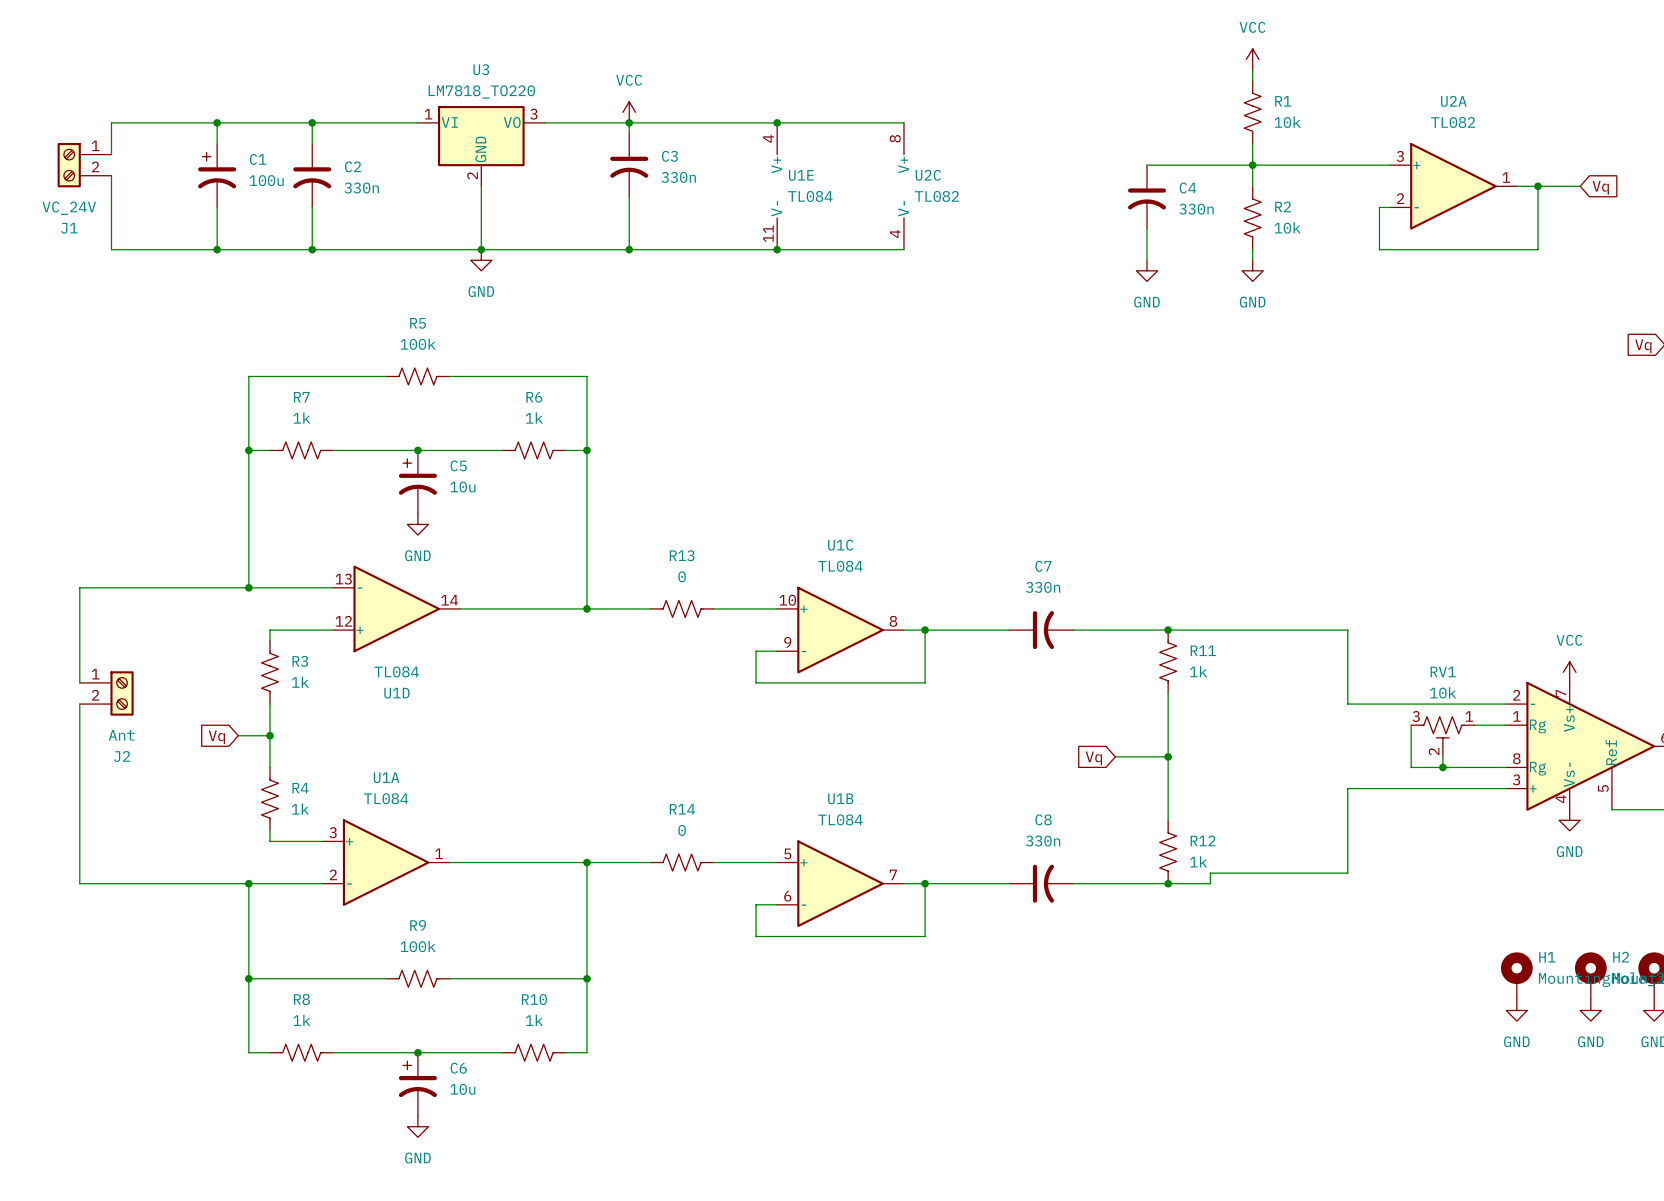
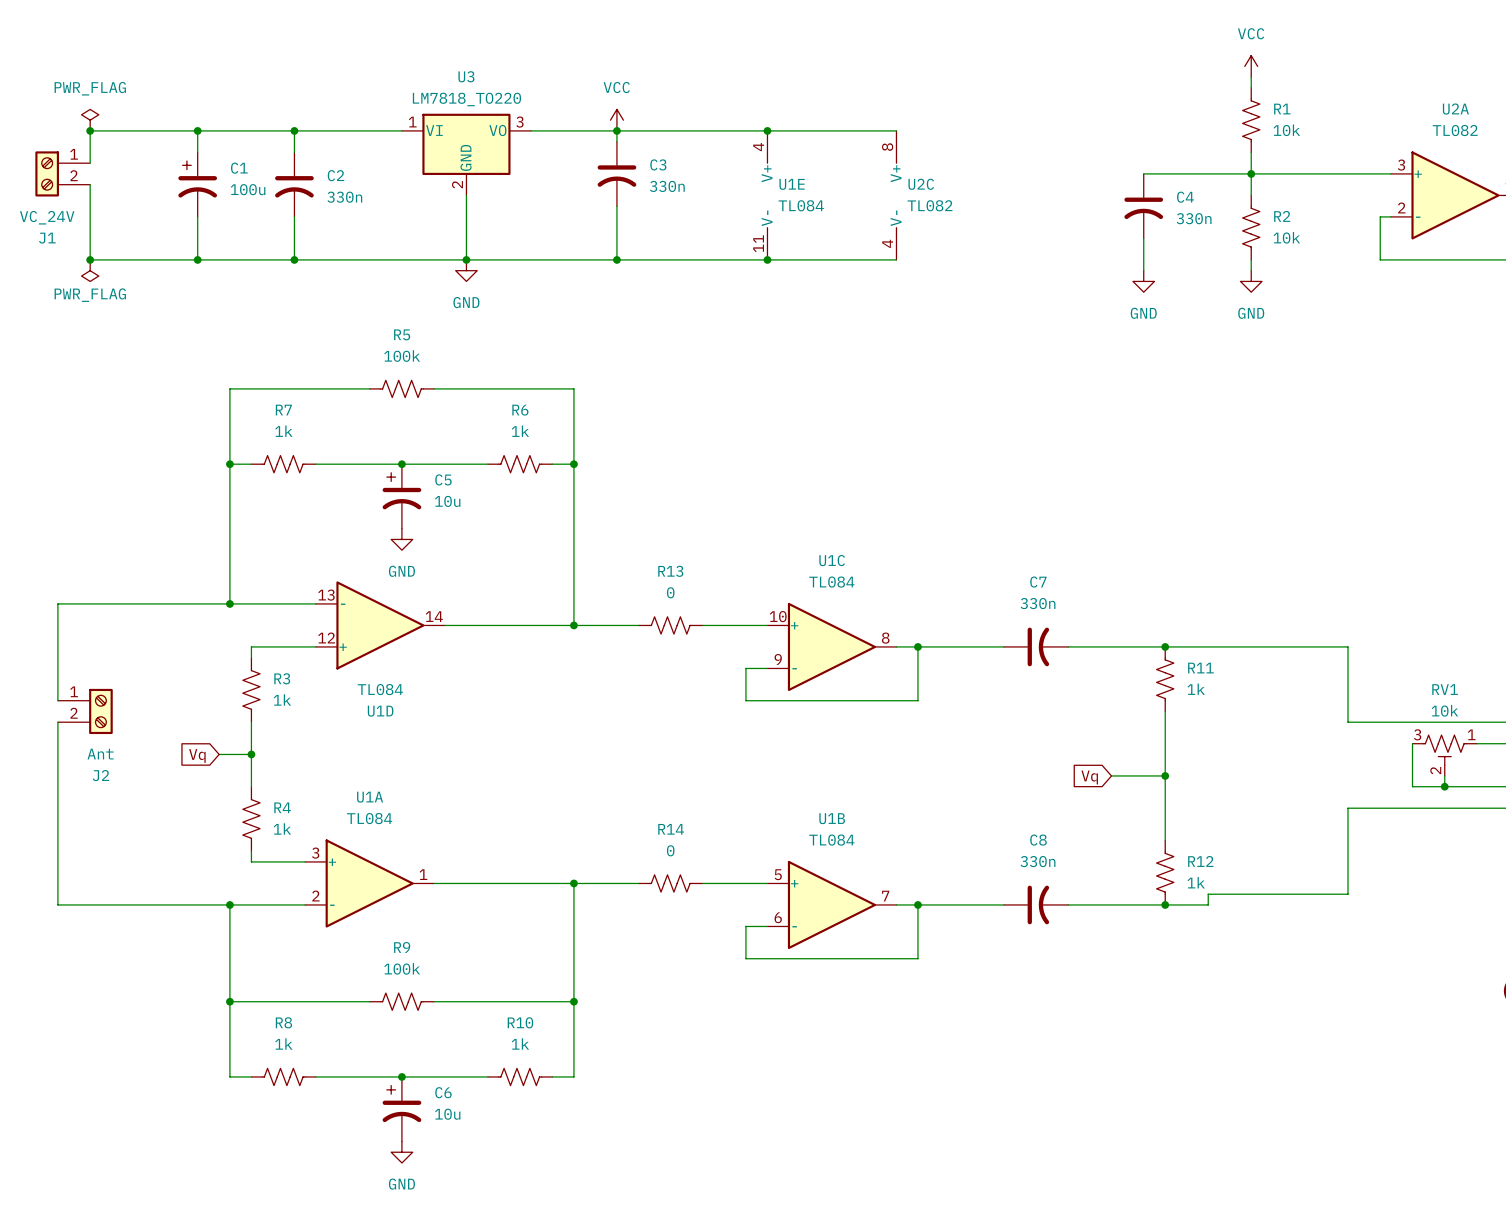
power symbol: none -> PWR_FLAG (90, 120)
junction: none -> (90, 130)
junction: none -> (90, 259)
power symbol: none -> PWR_FLAG (90, 270)

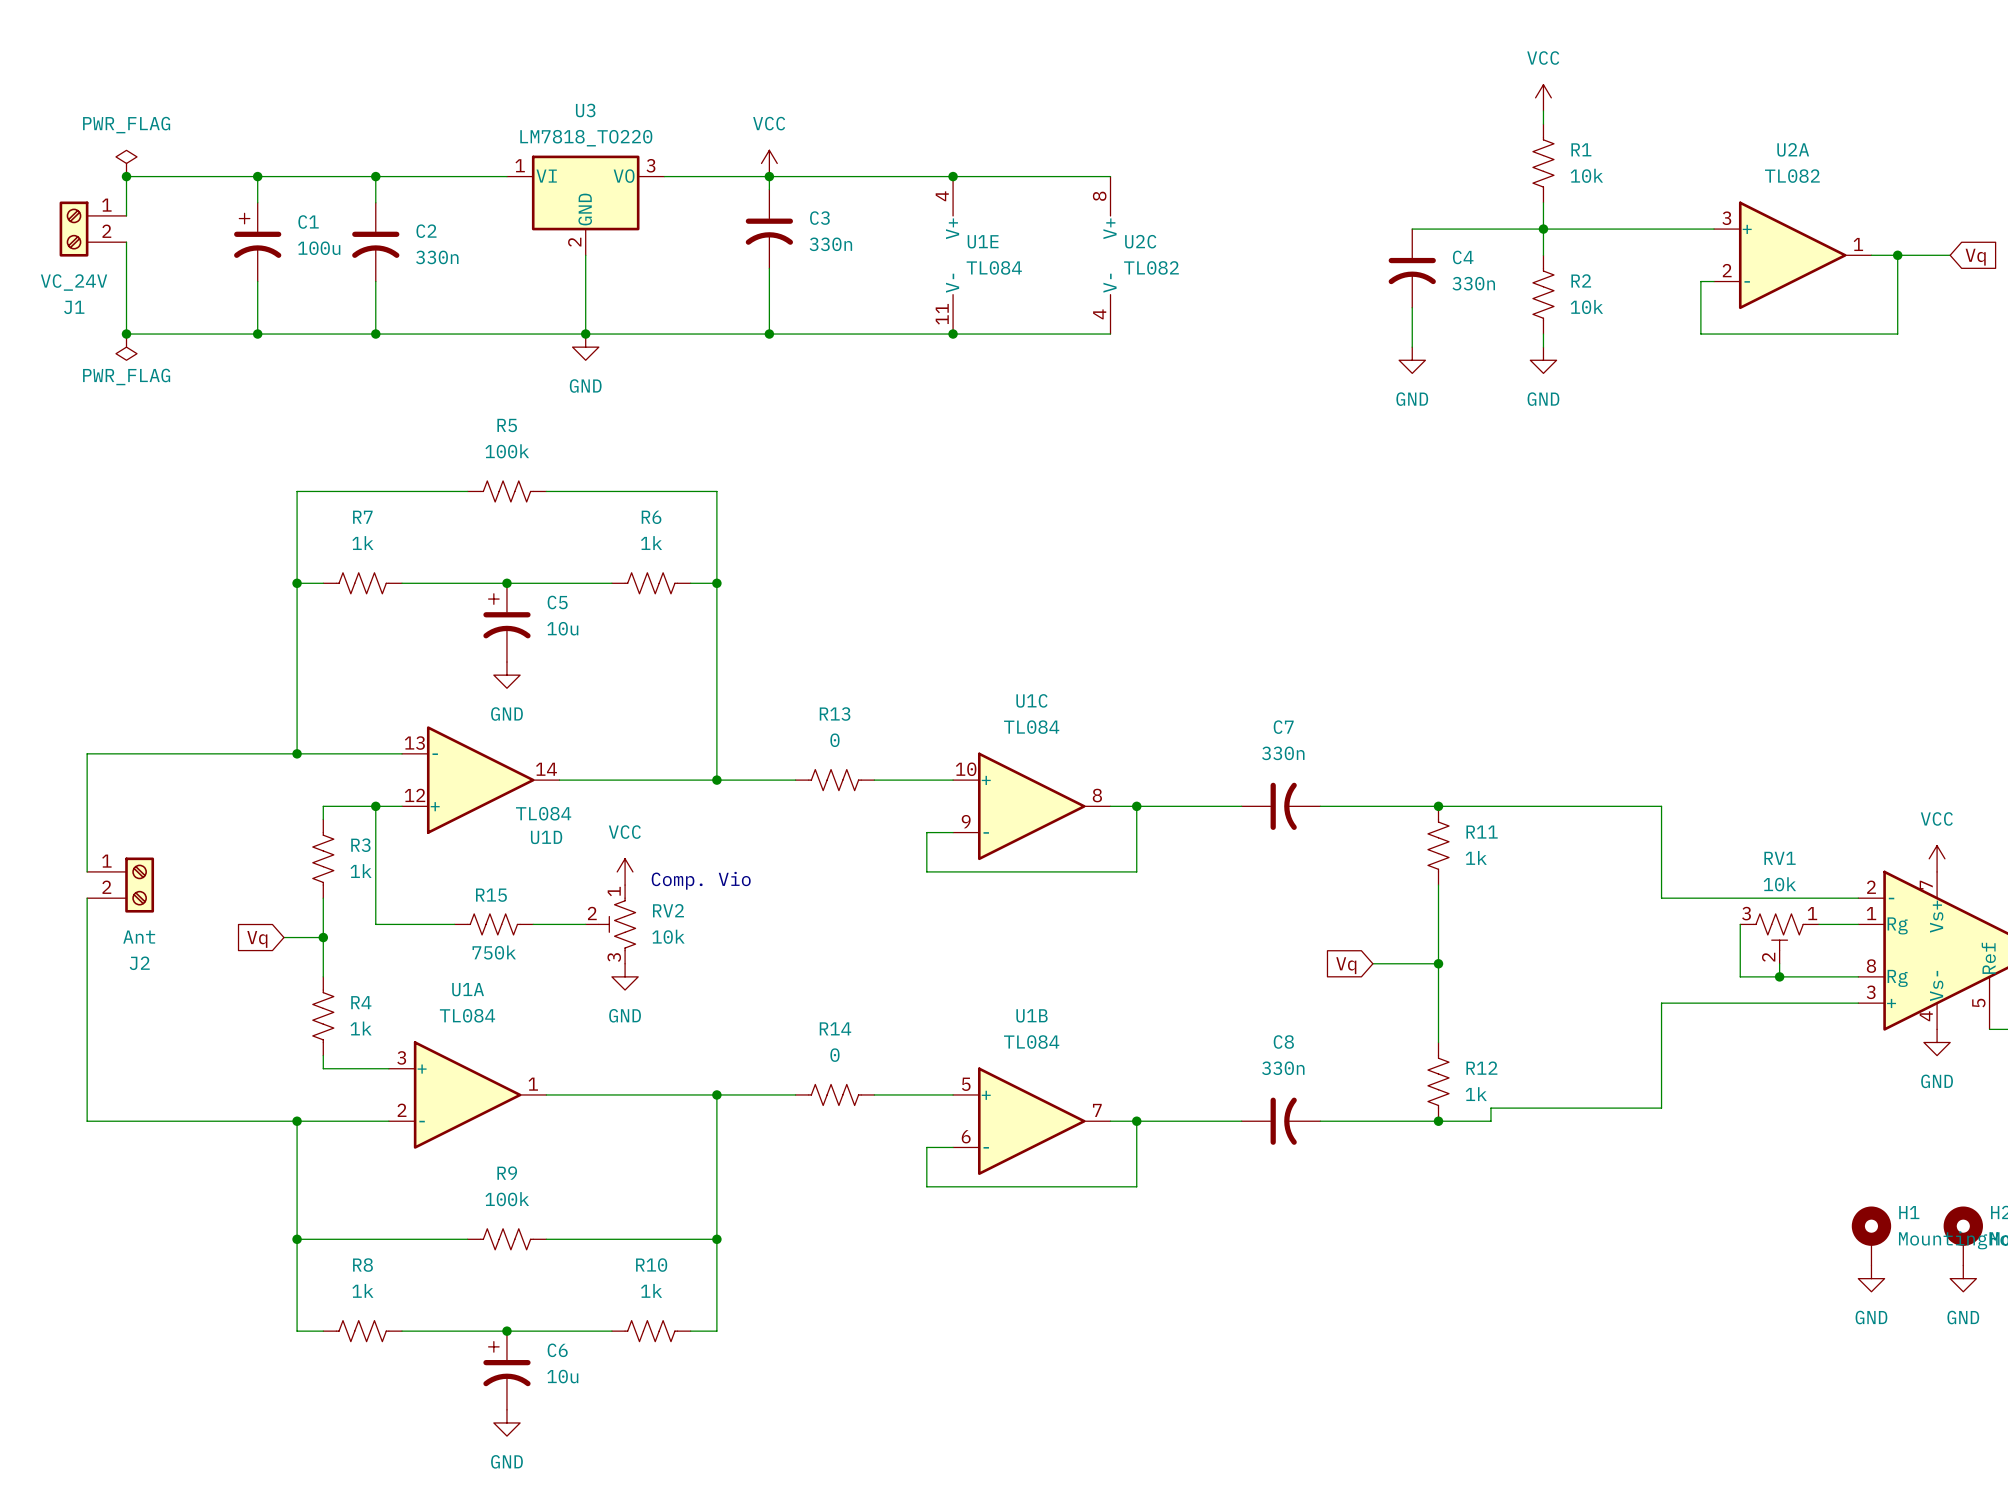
wire: none -> (375, 806) (375, 924) (454, 924)
junction: none -> (375, 806)
U1D value position: TL084 (380, 689) -> TL084 (543, 813)
power symbol: none -> VCC (625, 871)
text: none -> Comp. Vio (701, 880)
U1D name position: U1D (380, 711) -> U1D (546, 837)
R15: none -> 750k (493, 924)
wire: none -> (533, 924) (585, 924)
RV2: none -> 10k (610, 924)
power symbol: none -> GND (625, 976)

